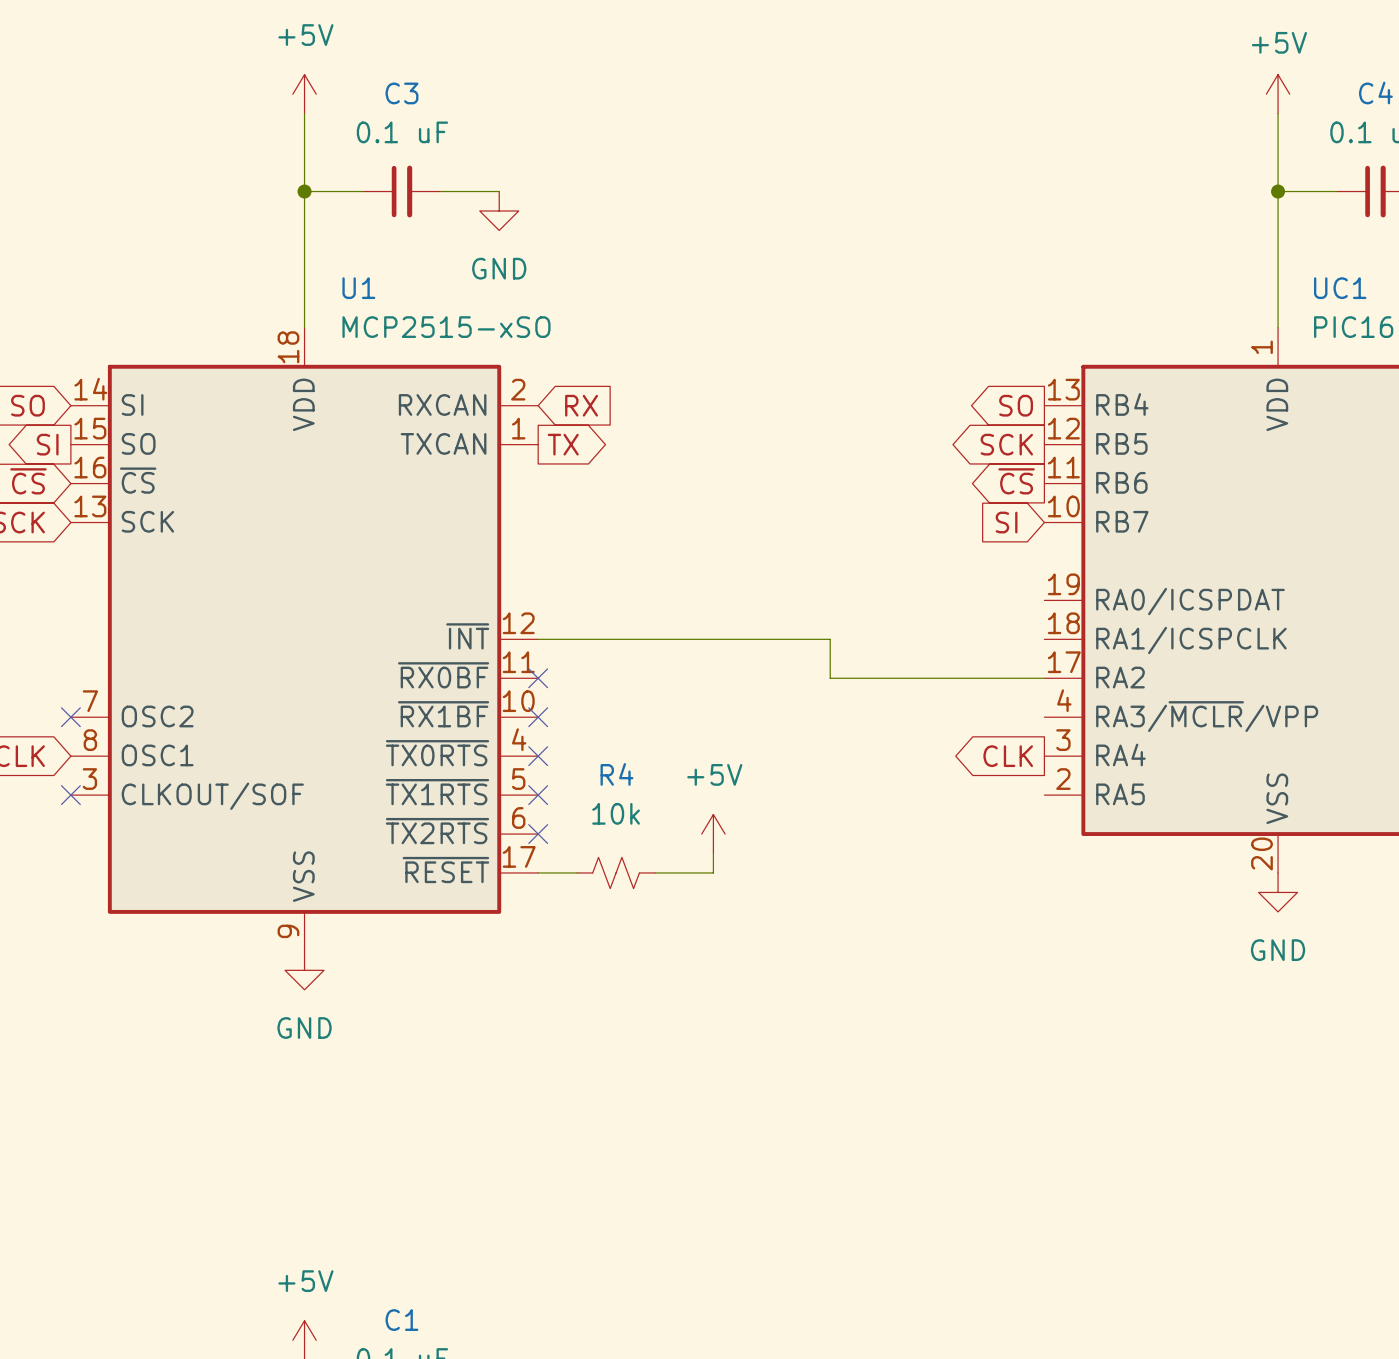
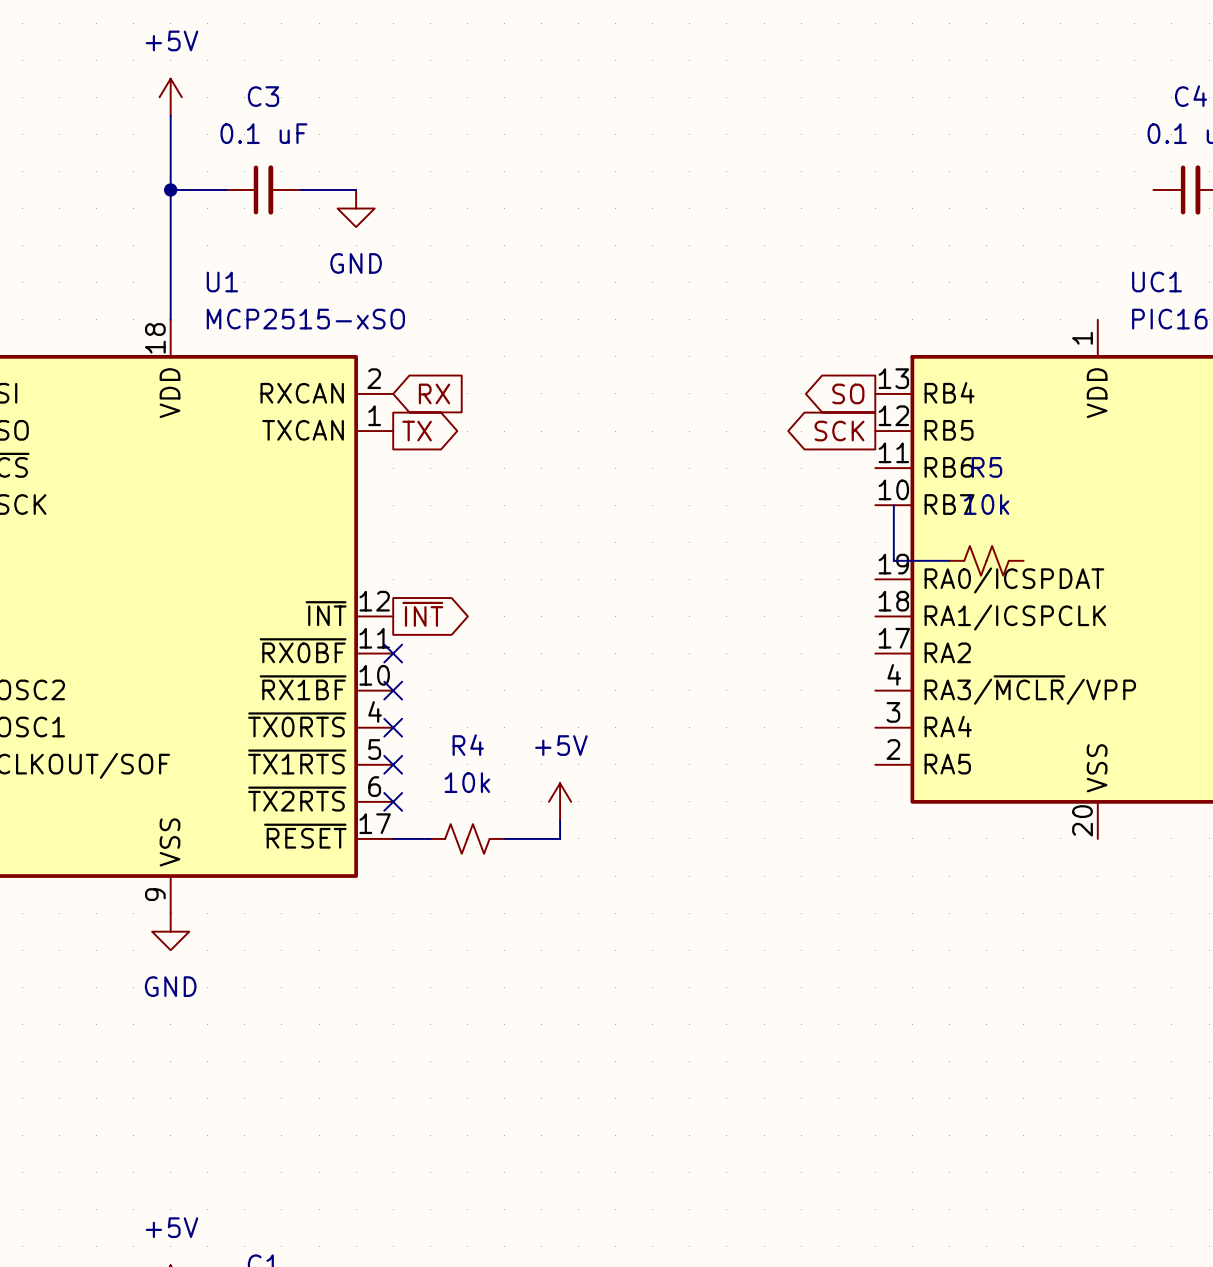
power symbol: +5V (1278, 94) -> none
wire: (1278, 113) (1278, 327) -> none
wire: (1278, 191) (1336, 191) -> none
junction: (1278, 191) -> none
global label: ~{CS} (1016, 481) -> none
global label: SI (1006, 522) -> none
wire: none -> (893, 505) (893, 560) (949, 560)
R5: none -> 10k (986, 560)
global label: none -> ~{INT} (422, 614)
wire: (538, 639) (830, 639) (830, 678) (1044, 678) -> none
global label: CLK (1008, 756) -> none
power symbol: GND (1278, 892) -> none

